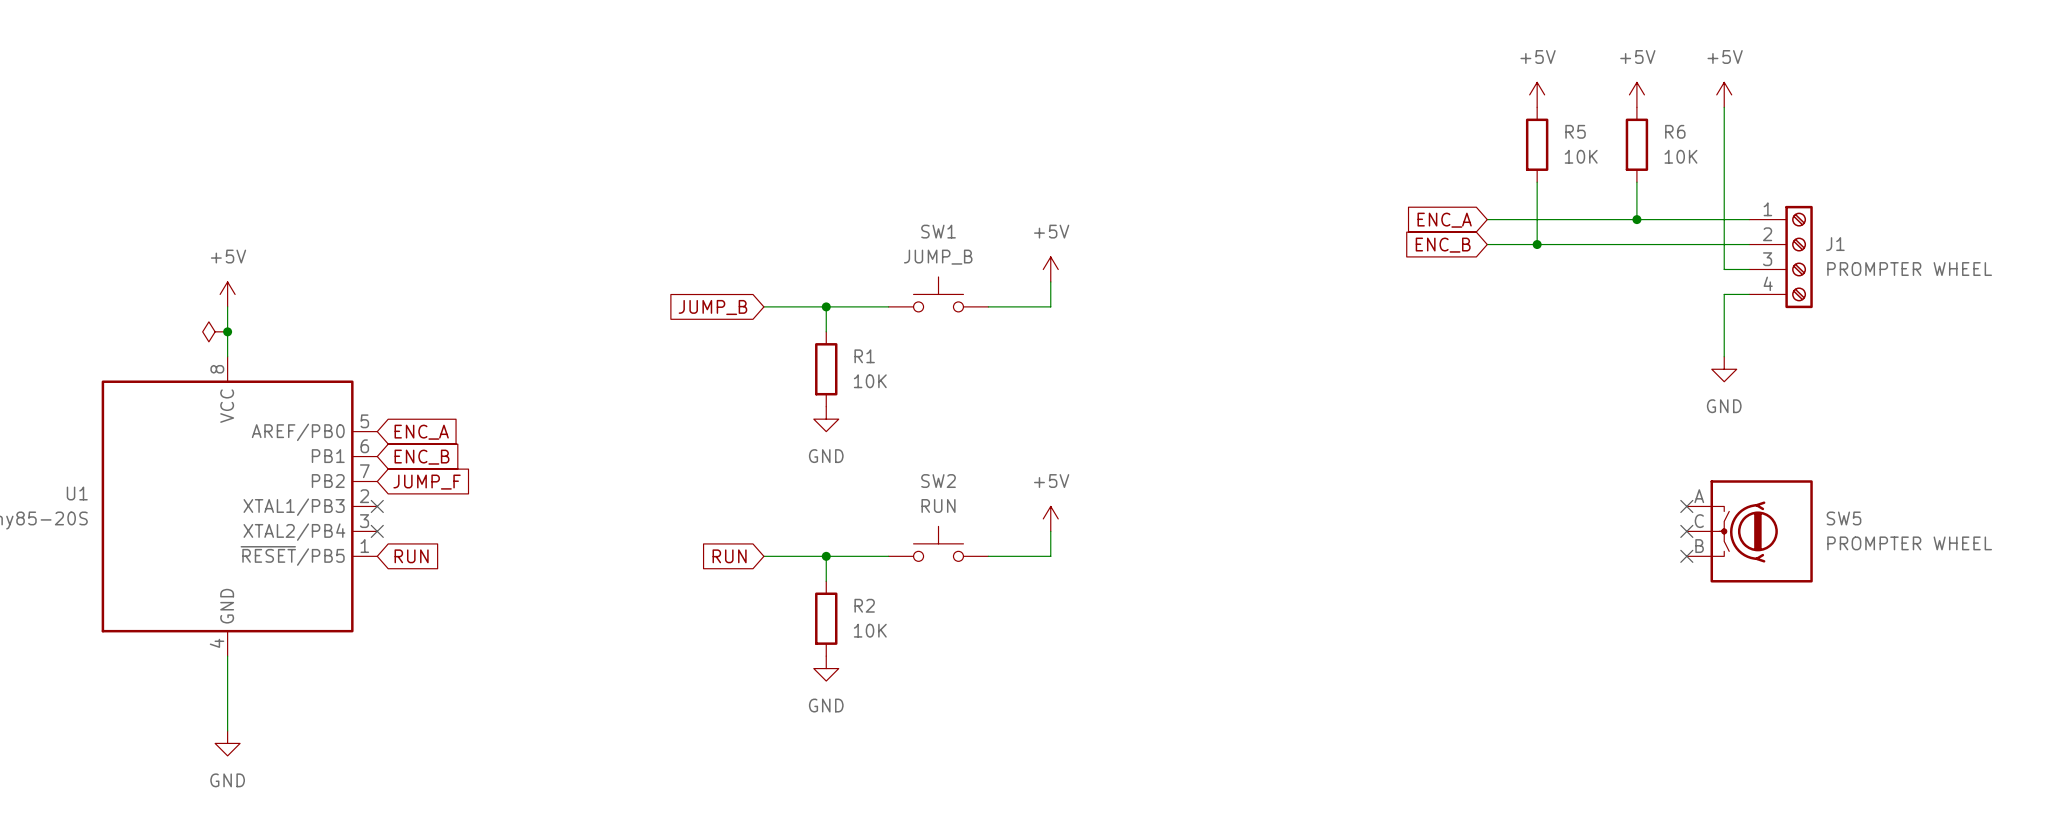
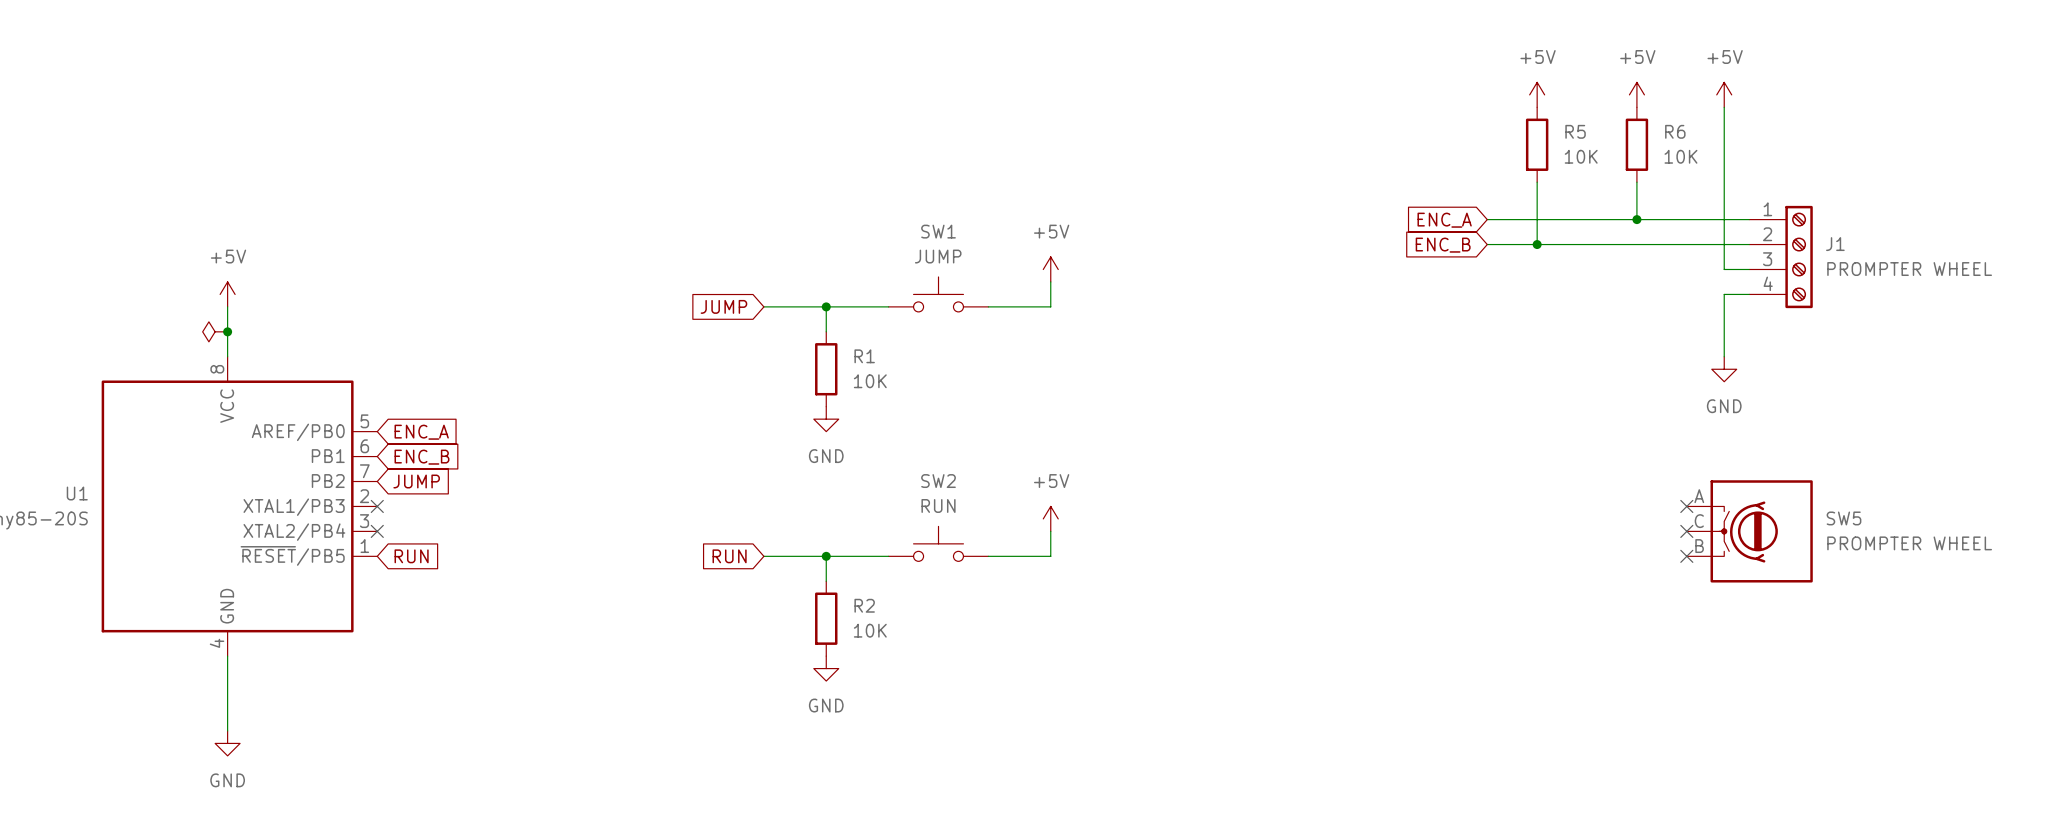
SW1 value: JUMP_B (938, 257) -> JUMP (938, 256)
global label: JUMP_B (712, 307) -> JUMP (723, 306)
global label: JUMP_F (427, 482) -> JUMP (416, 481)

